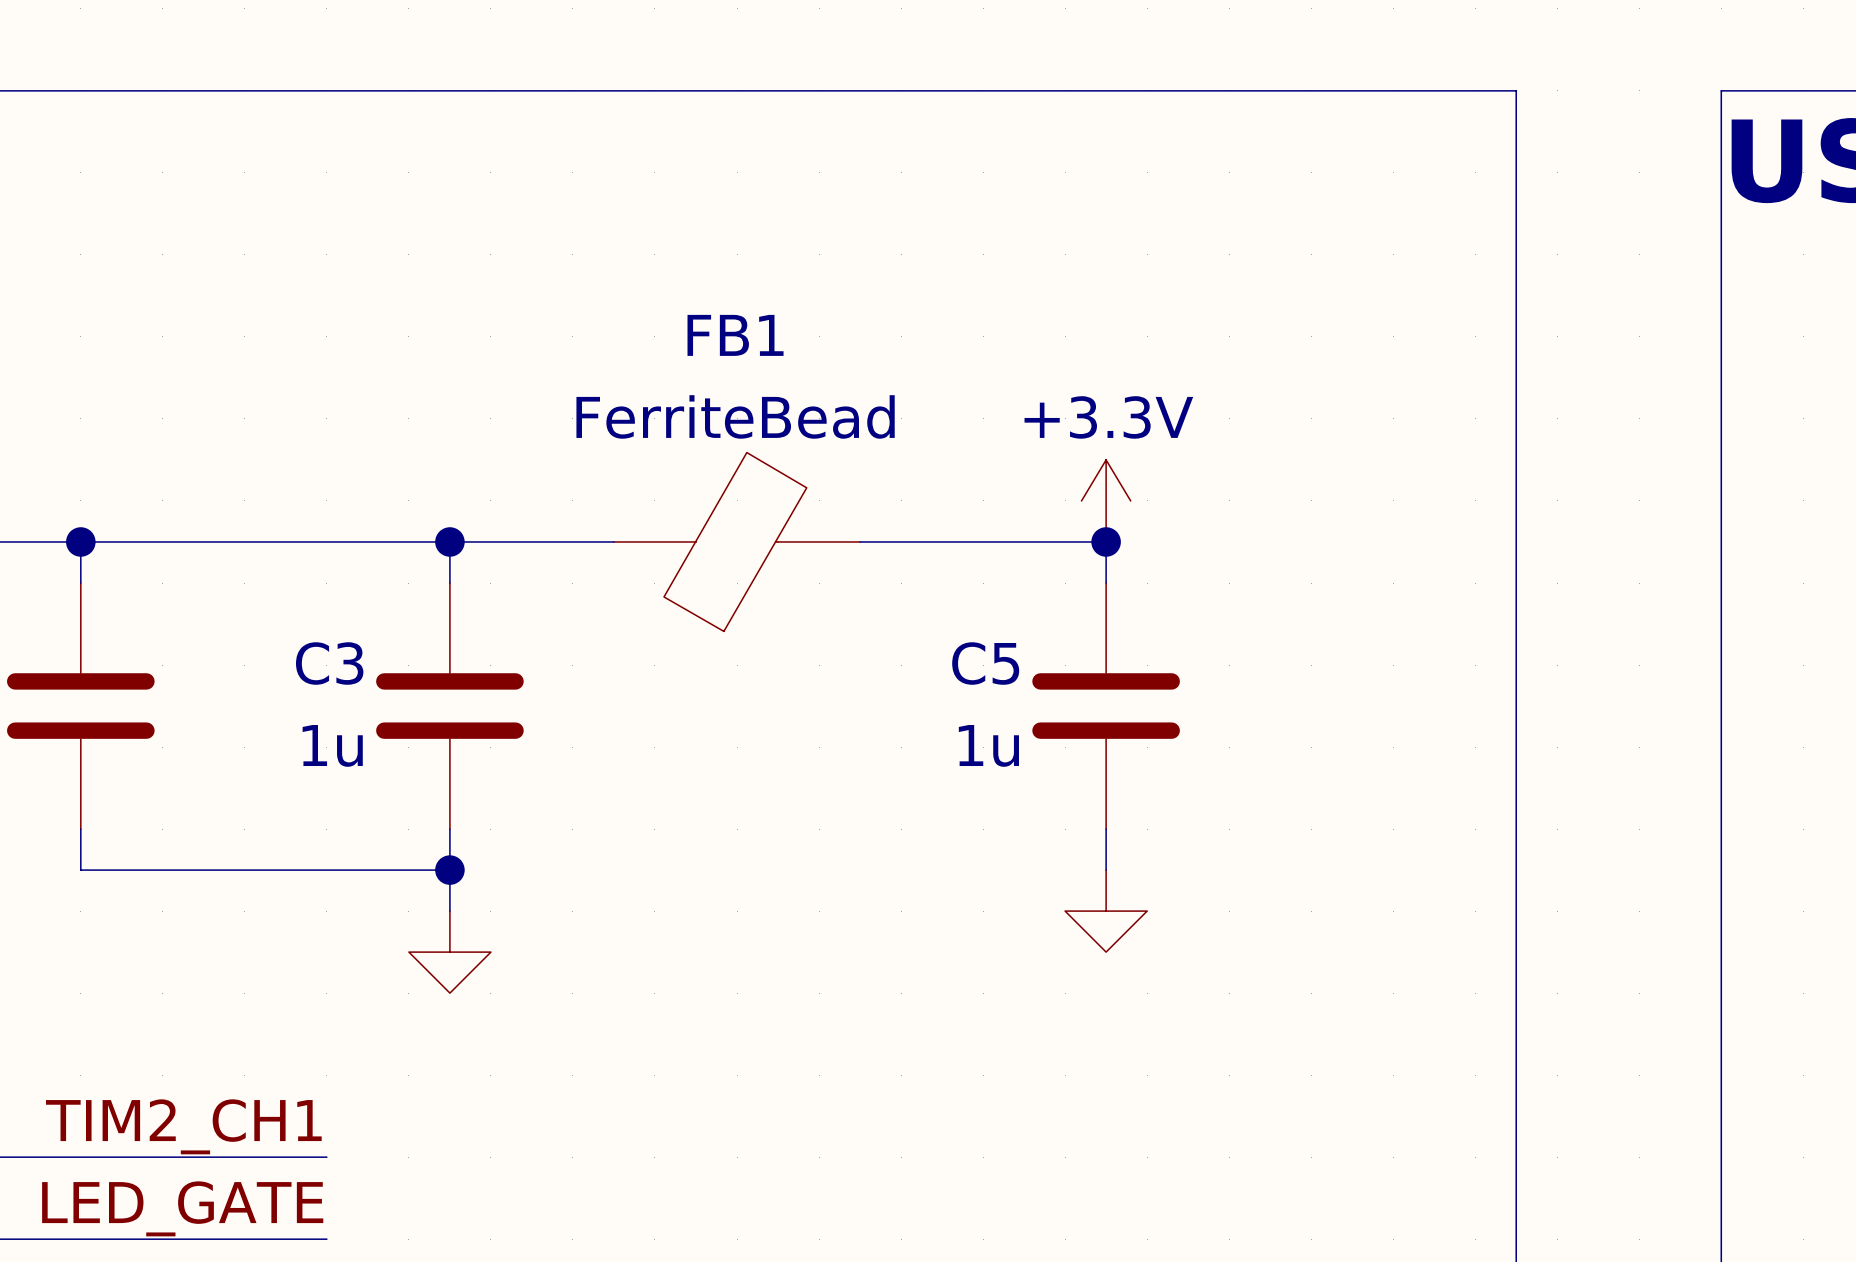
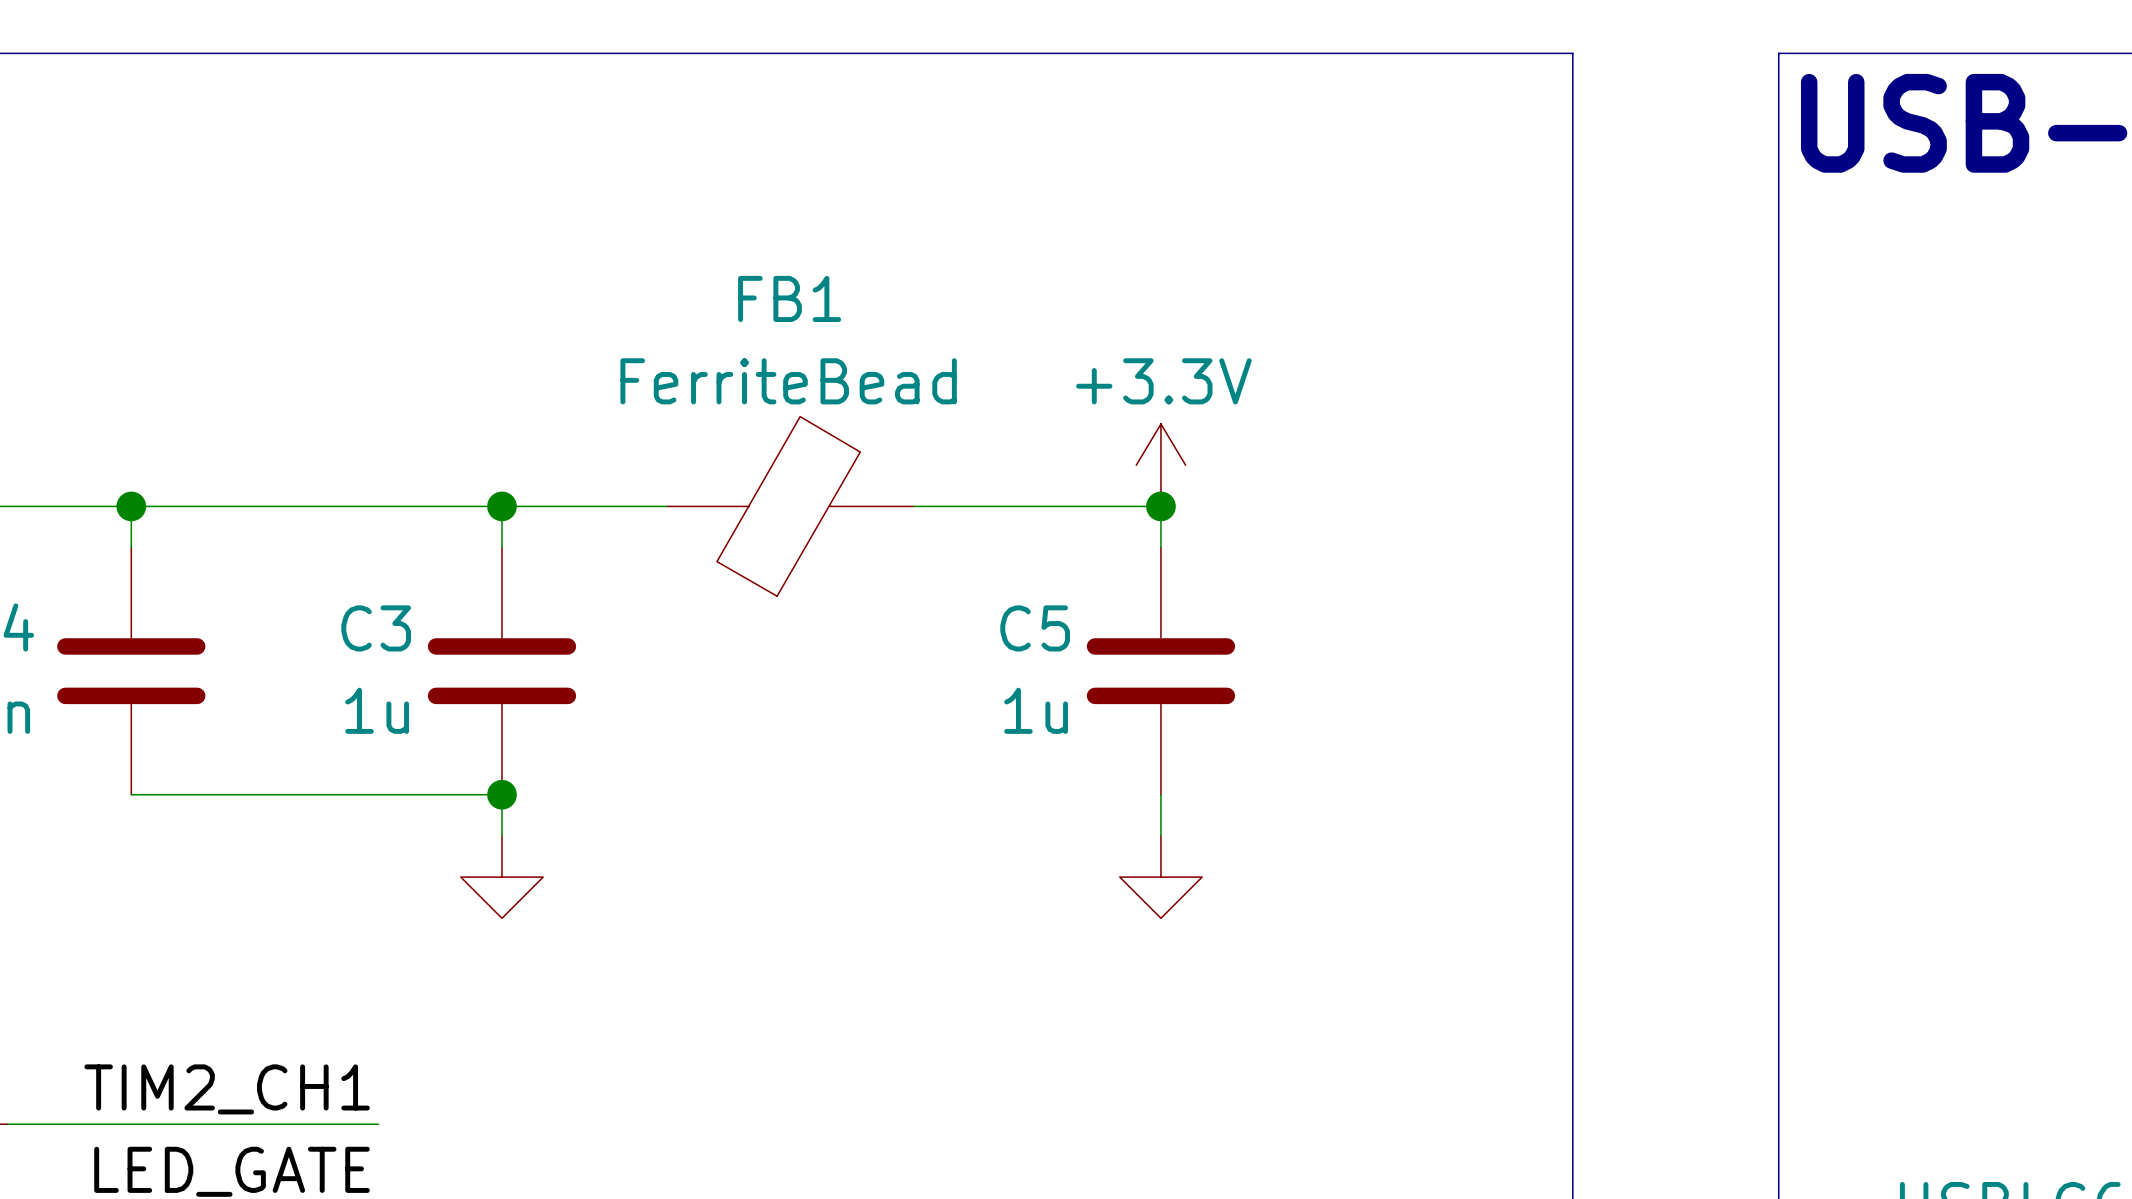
wire: (80, 829) (80, 870) (449, 870) (449, 911) -> (131, 794) (501, 794)
junction position: (449, 870) -> (501, 794)
power symbol position: (449, 952) -> (501, 877)

